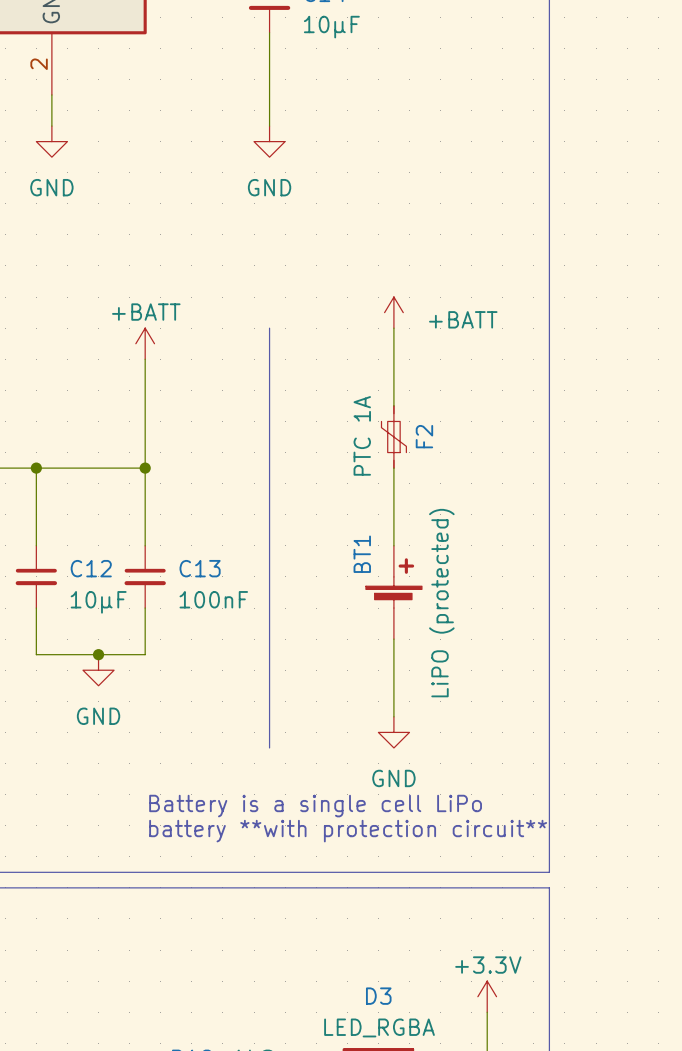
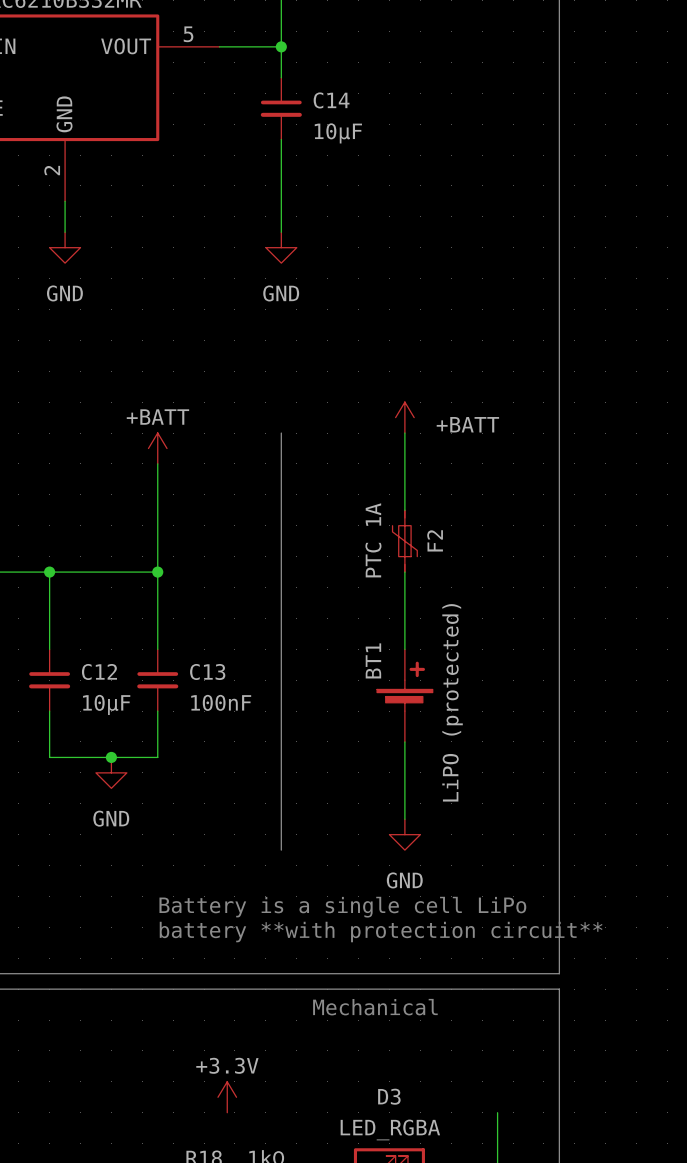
text: none -> Mechanical (375, 1007)
power symbol position: +3.3V (487, 996) -> +3.3V (227, 1097)

